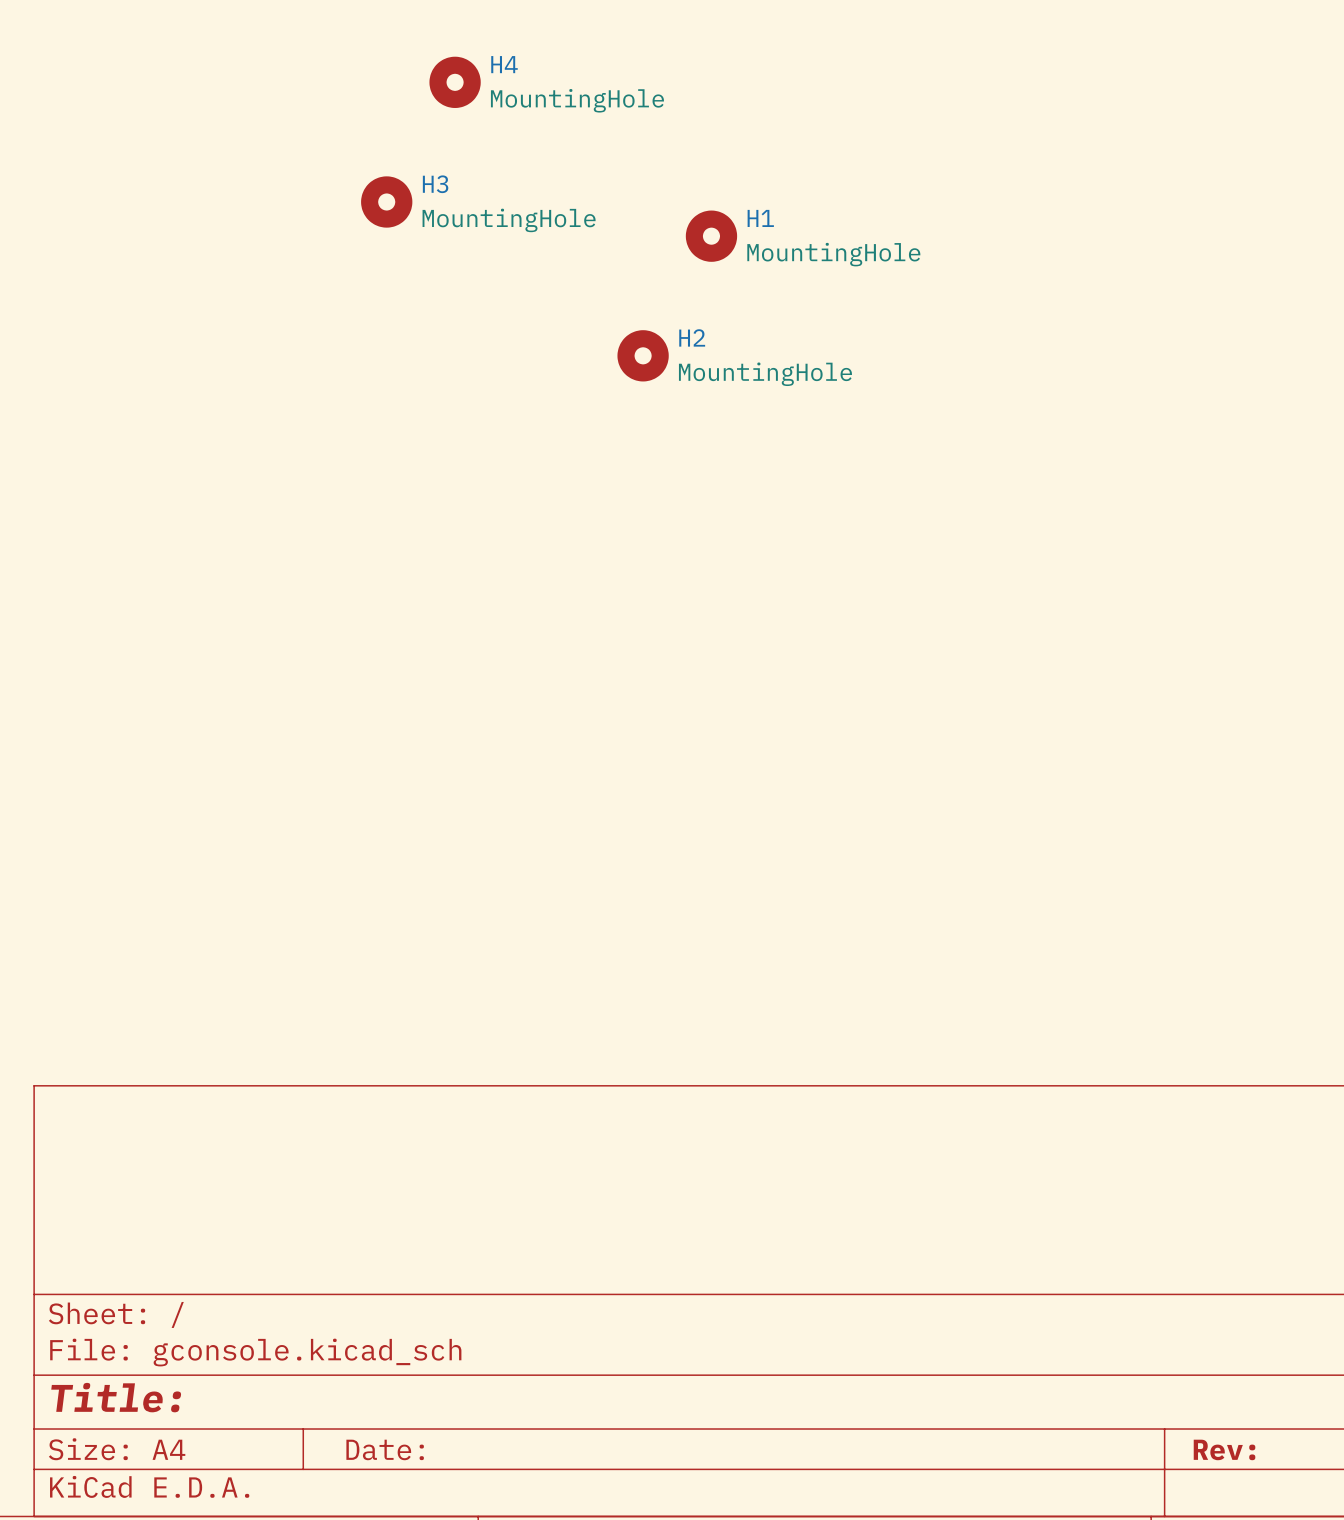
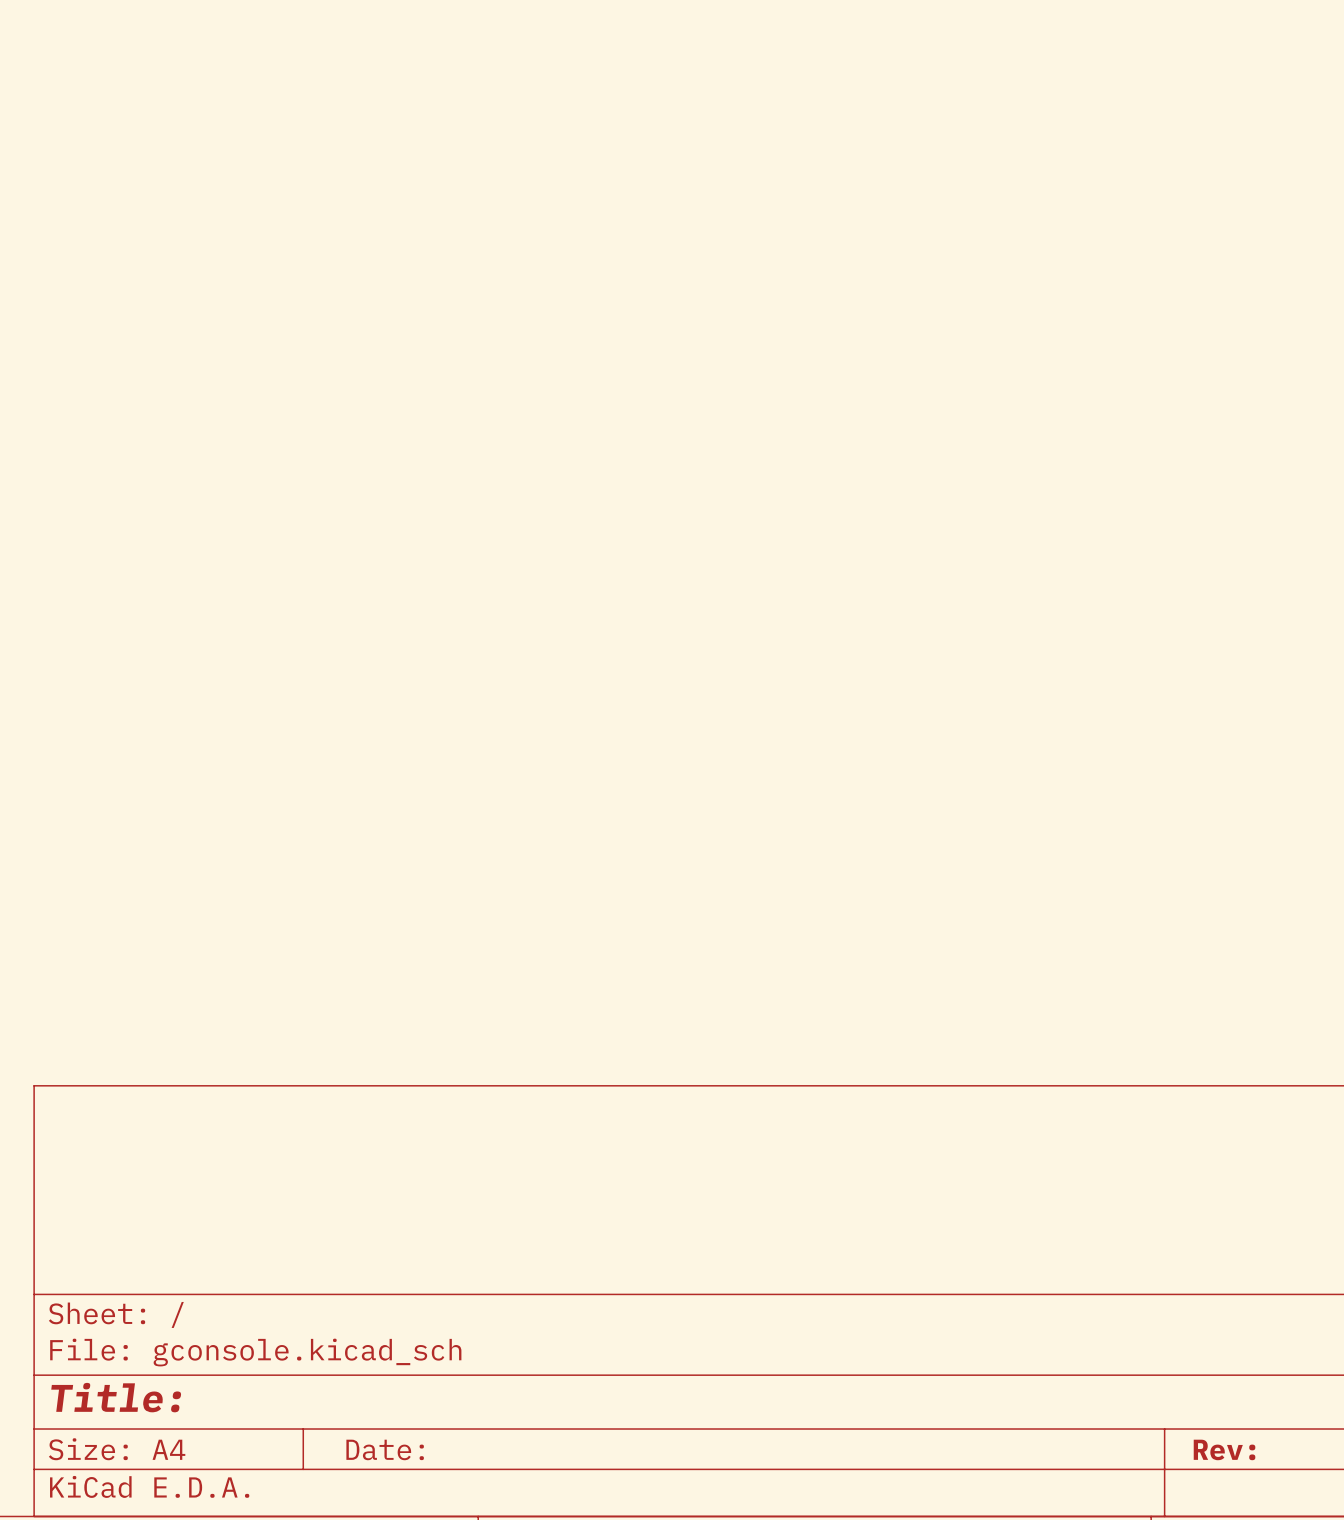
H4: MountingHole (455, 82) -> none
H3: MountingHole (386, 201) -> none
H1: MountingHole (711, 236) -> none
H2: MountingHole (643, 355) -> none

